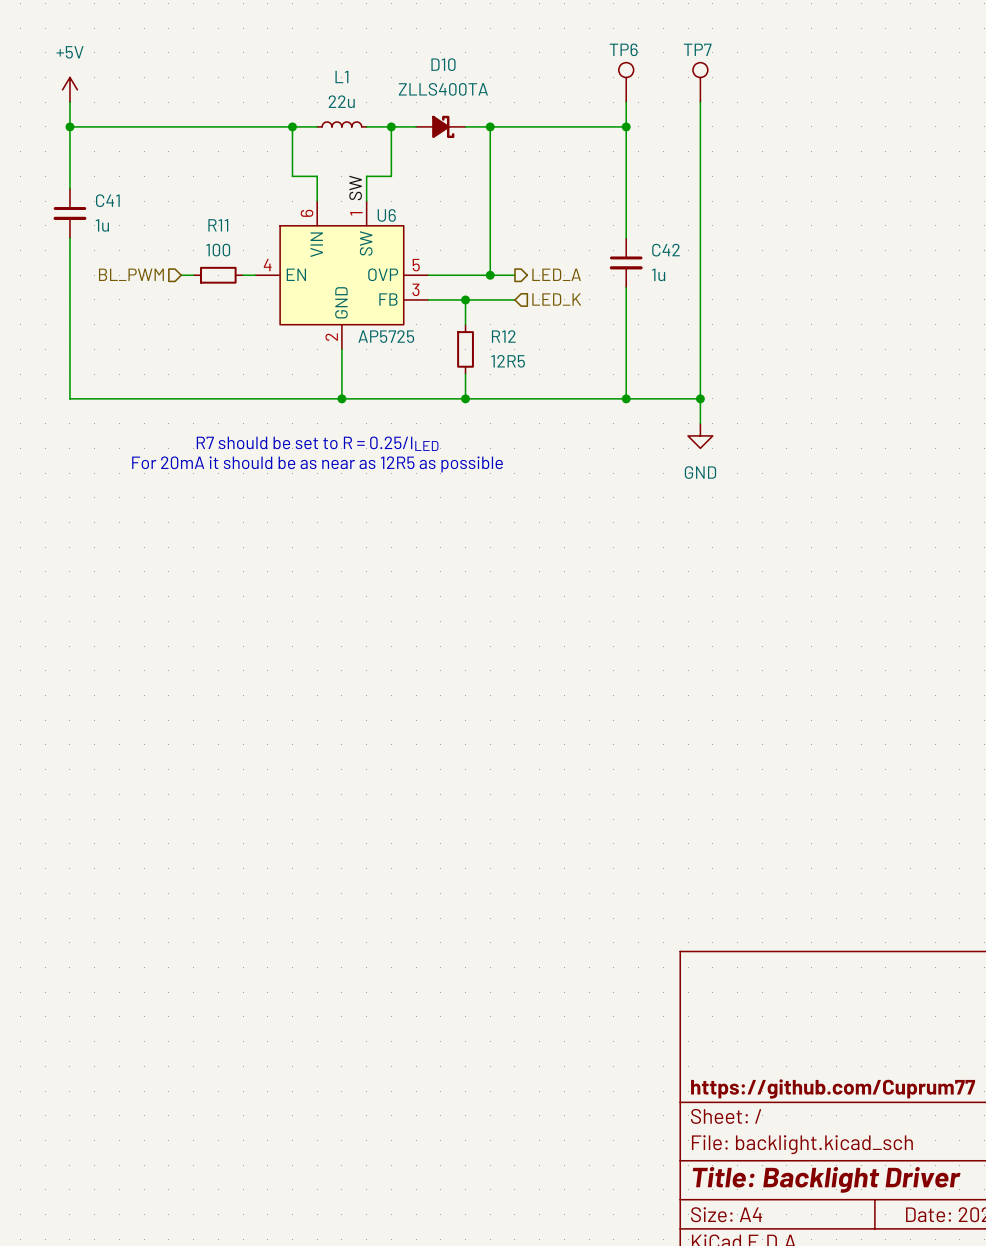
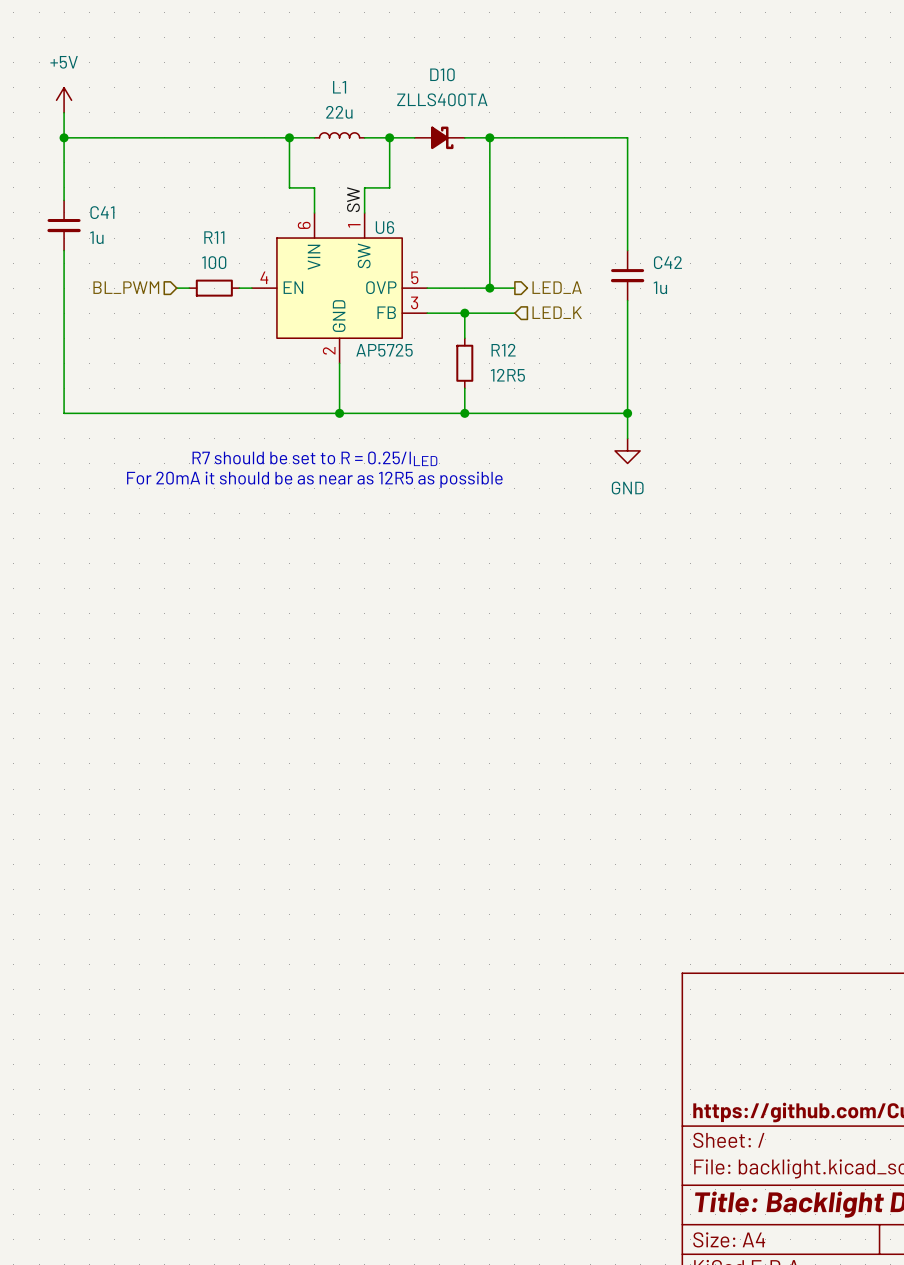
TP6: (626, 82) -> none
TP7: (700, 82) -> none
wire: (626, 102) (626, 126) -> none
wire: (700, 102) (700, 423) -> none
junction: (626, 126) -> none
wire: (626, 398) (700, 398) -> (627, 413) (627, 438)
junction: (700, 398) -> none
power symbol position: GND (700, 435) -> GND (627, 450)

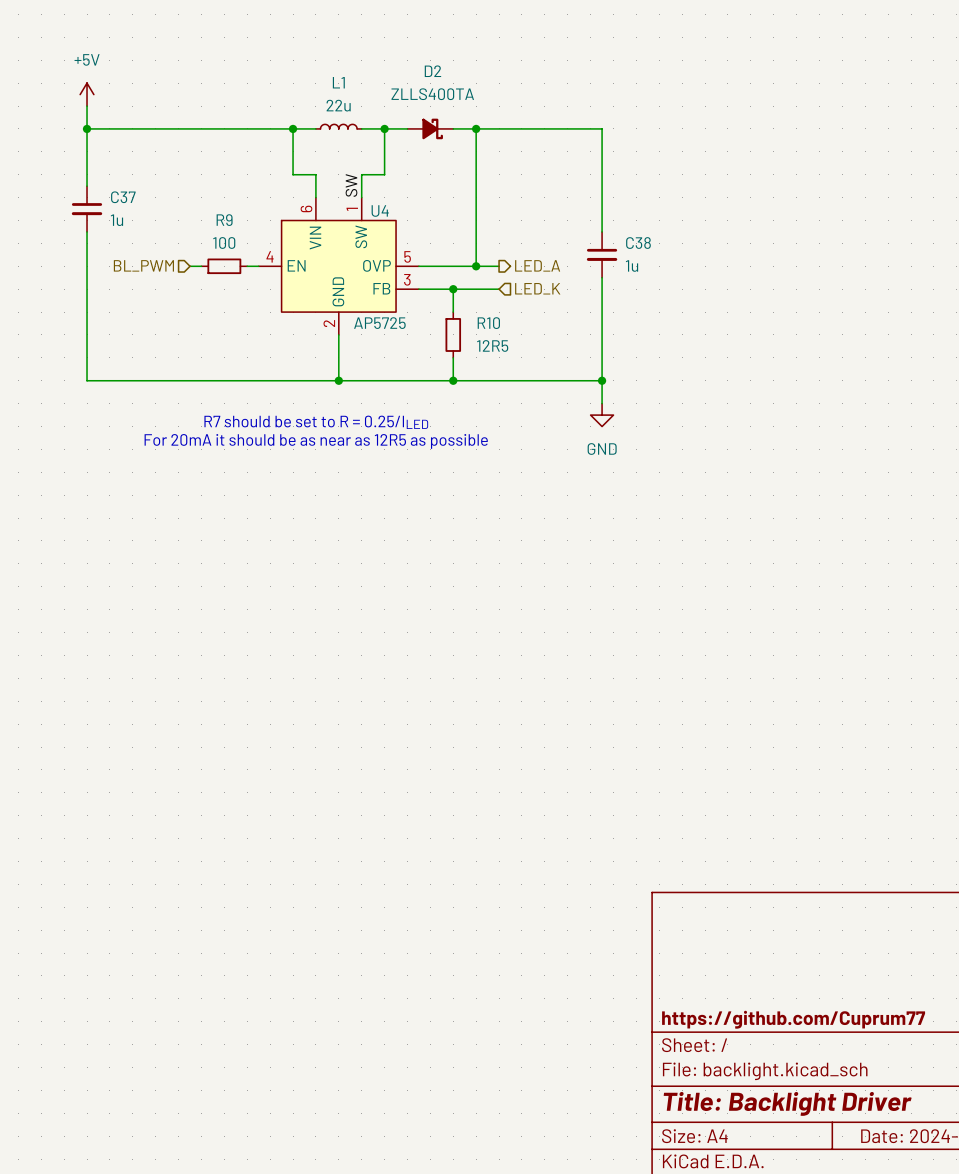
D10 name: D10 (442, 74) -> D2 (432, 71)
C41 name: C41 (102, 212) -> C37 (123, 197)
U6 name: U6 (384, 227) -> U4 (380, 210)
R11 name: R11 (214, 237) -> R9 (224, 220)
C42 name: C42 (667, 262) -> C38 (638, 243)
R12 name: R12 (503, 350) -> R10 (488, 323)

